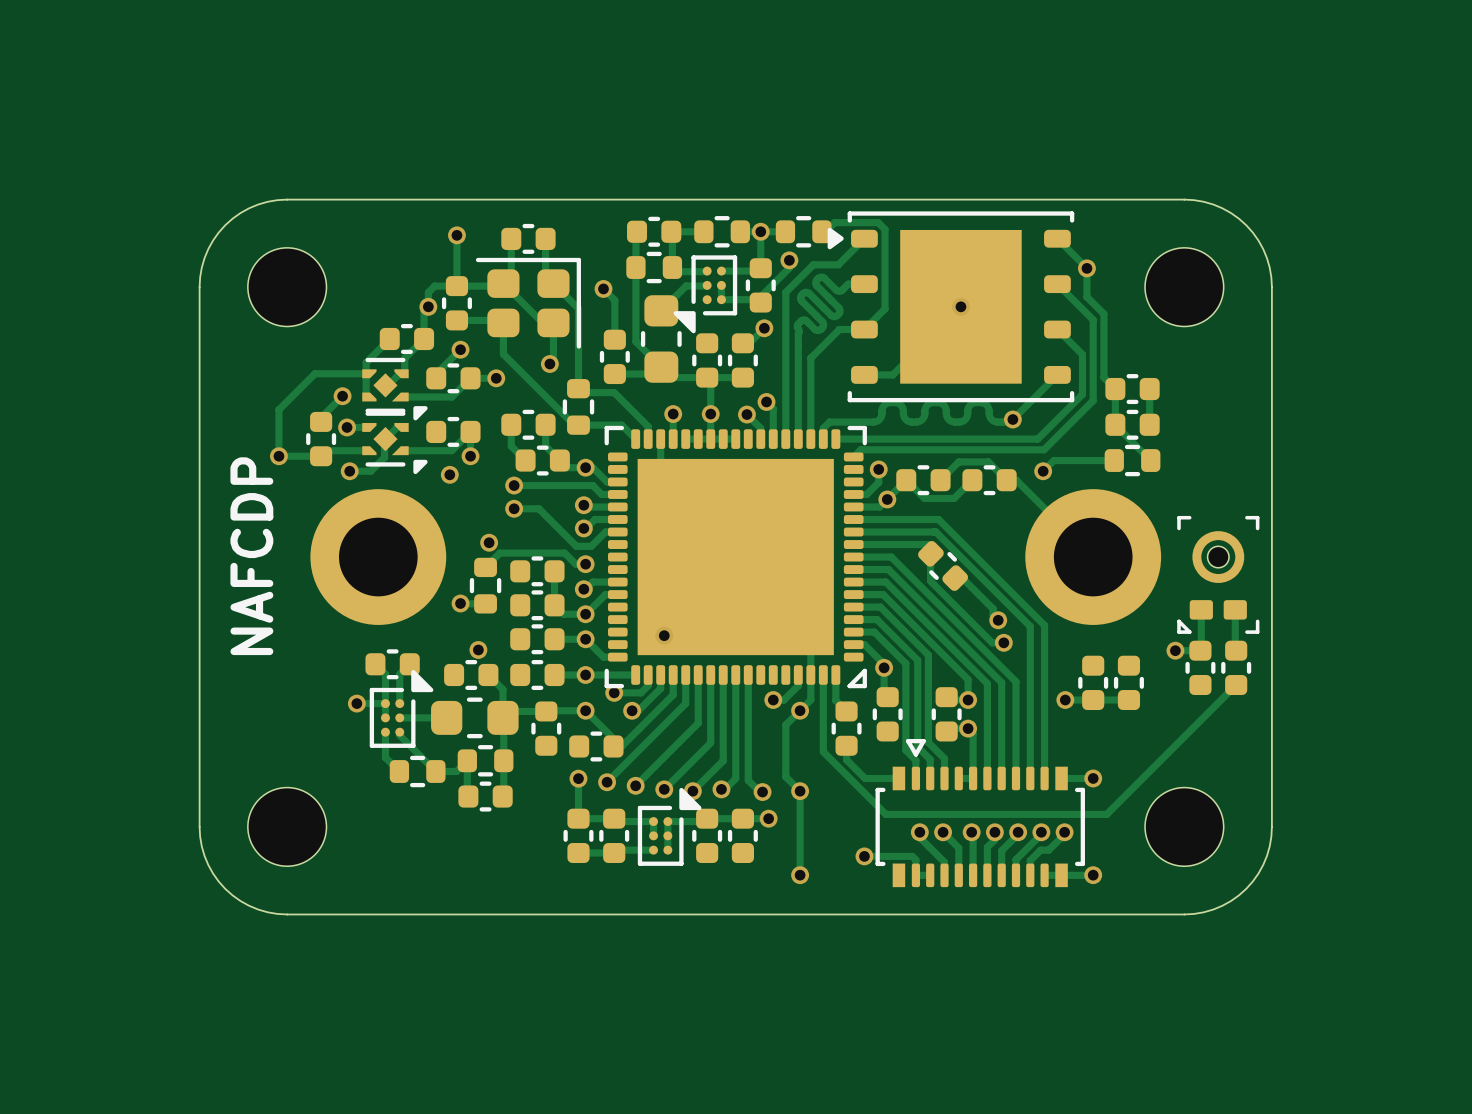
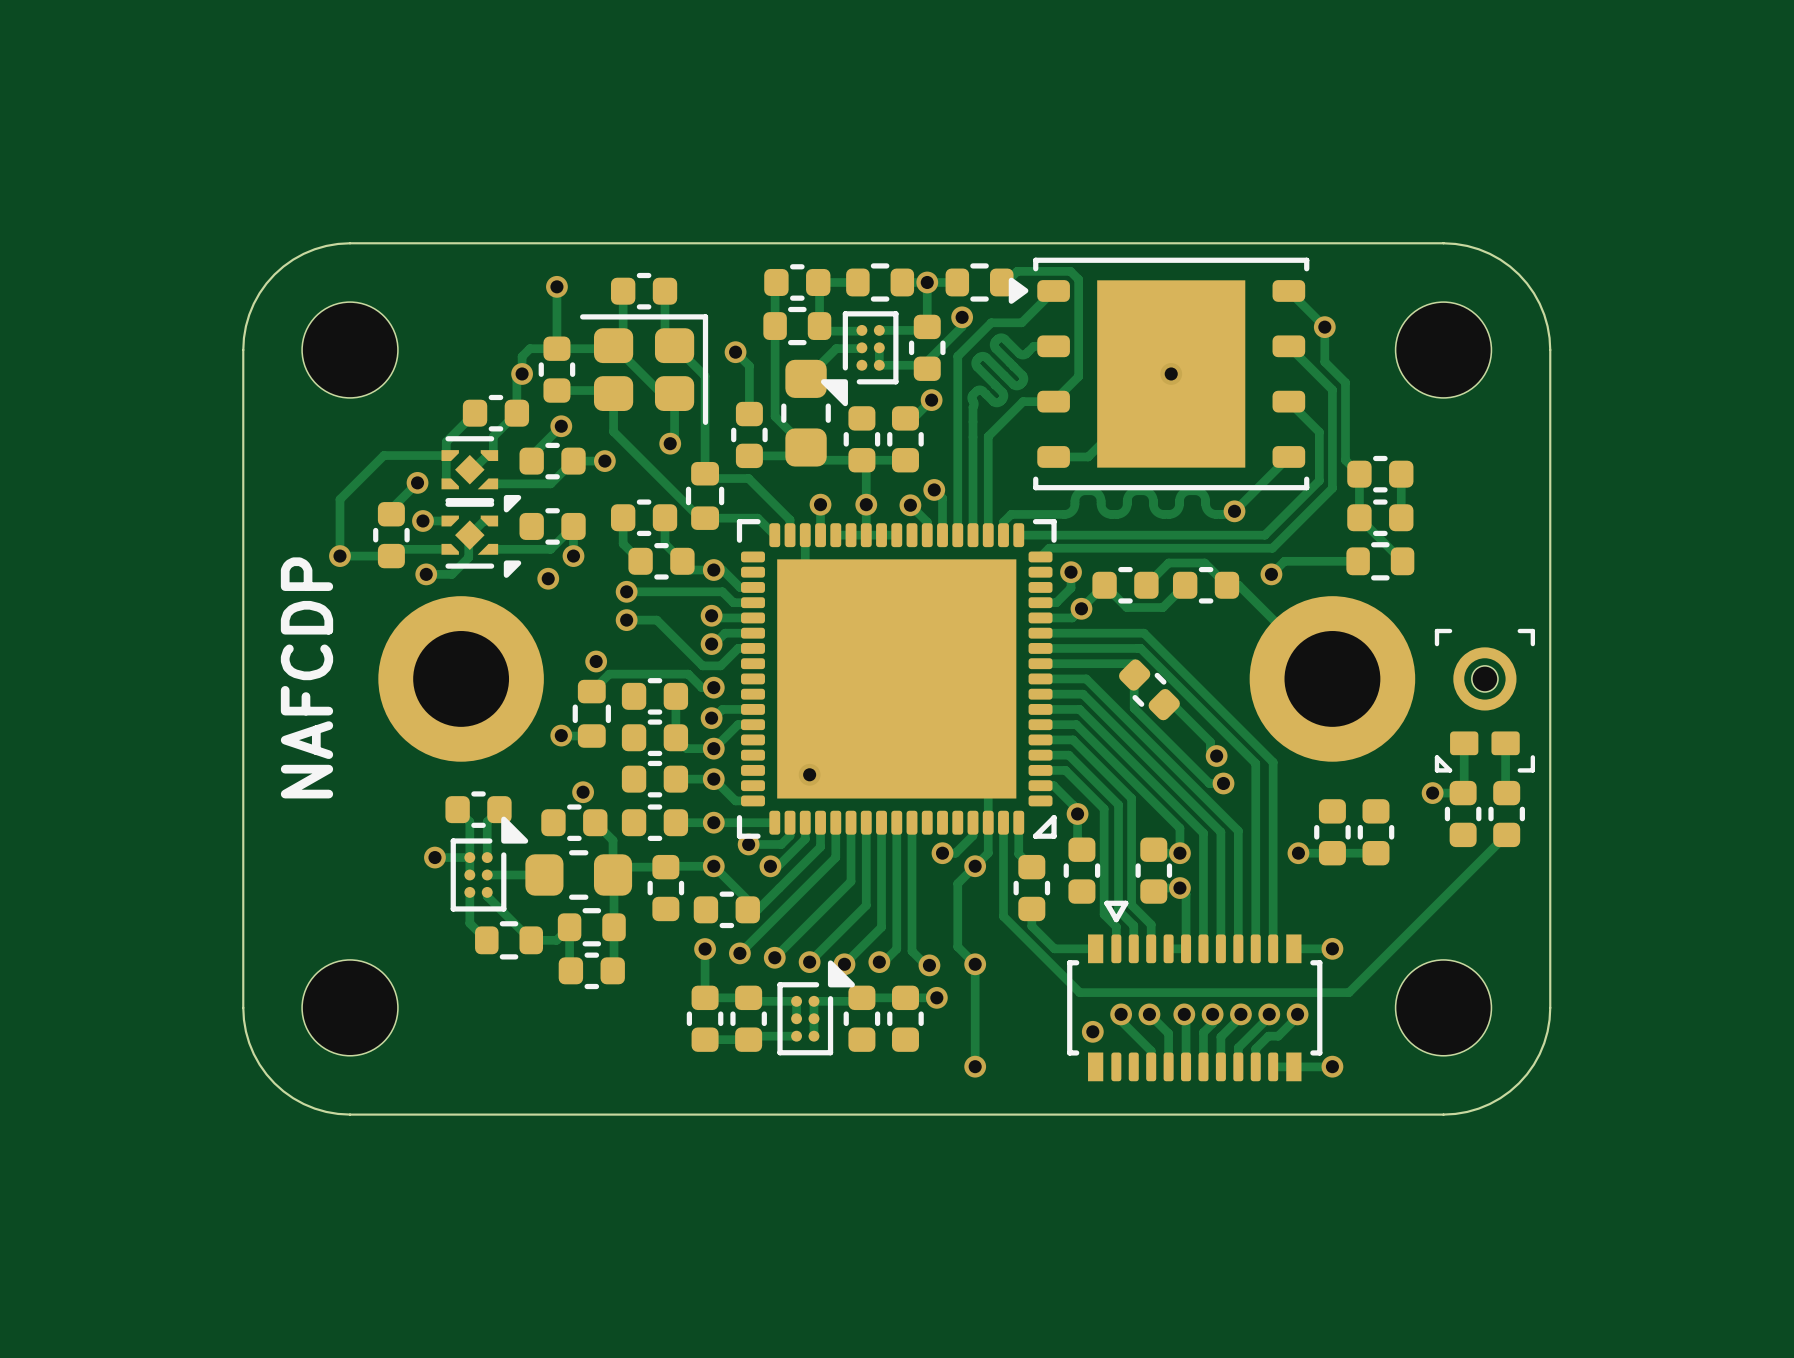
track: (864, 856) (912, 856) (915, 859) (915, 875) (930, 875) -> none
via position: (864, 856) -> (1092, 1031)

